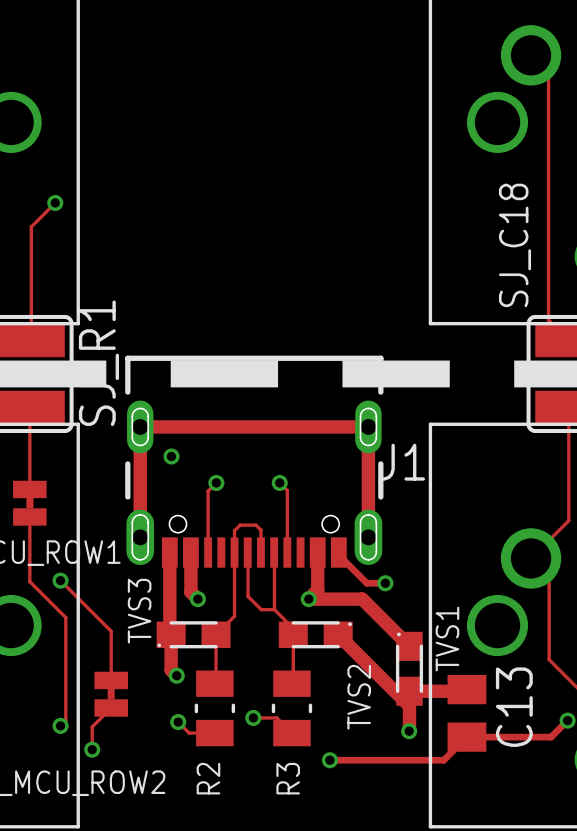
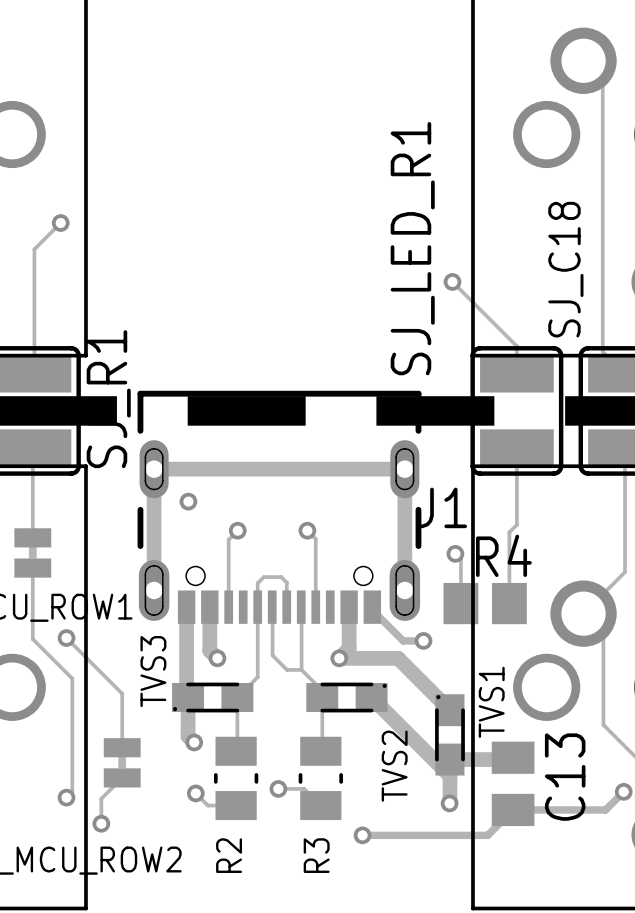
track: none -> (452, 281) (516, 346) (516, 374)
via: none -> (452, 281)
SJ_LED_R1: none -> (516, 410)
track: none -> (516, 447) (516, 524) (509, 532) (509, 603)
track: none -> (455, 553) (460, 559) (460, 603)
via: none -> (455, 553)
R4: none -> (485, 603)

